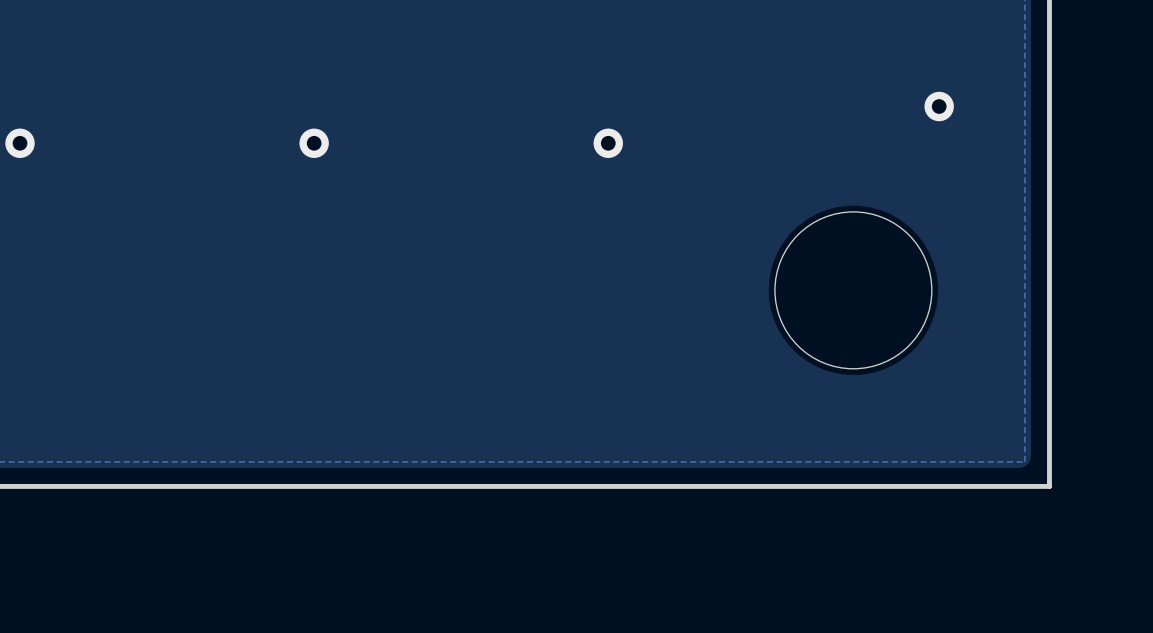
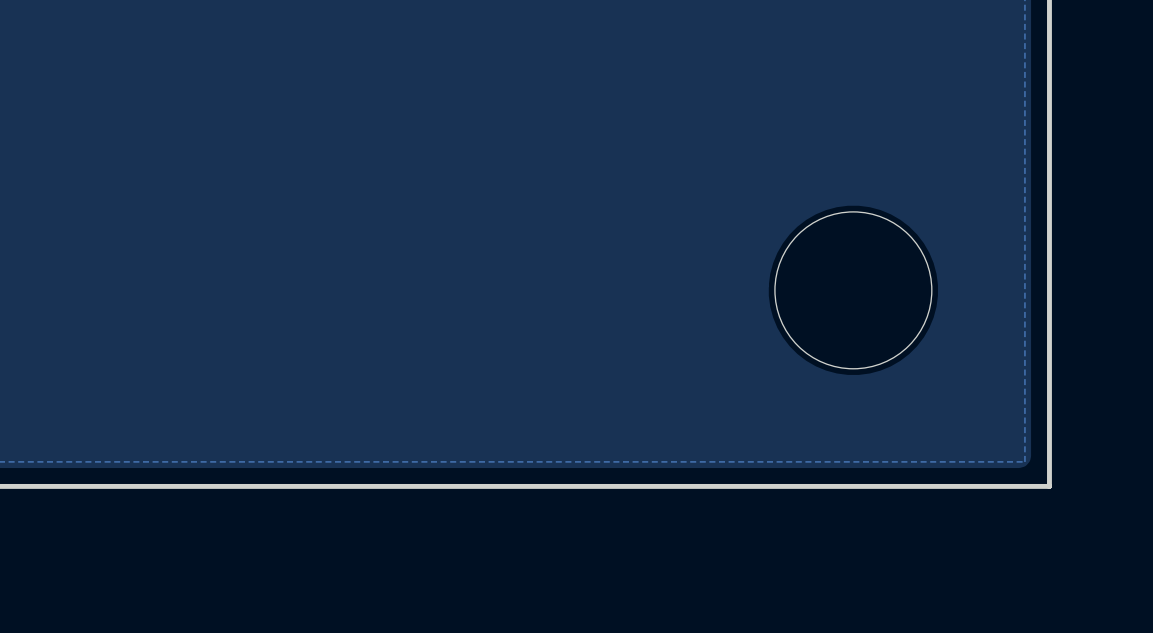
via: (939, 106) -> none
via: (20, 143) -> none
via: (314, 143) -> none
via: (608, 143) -> none

